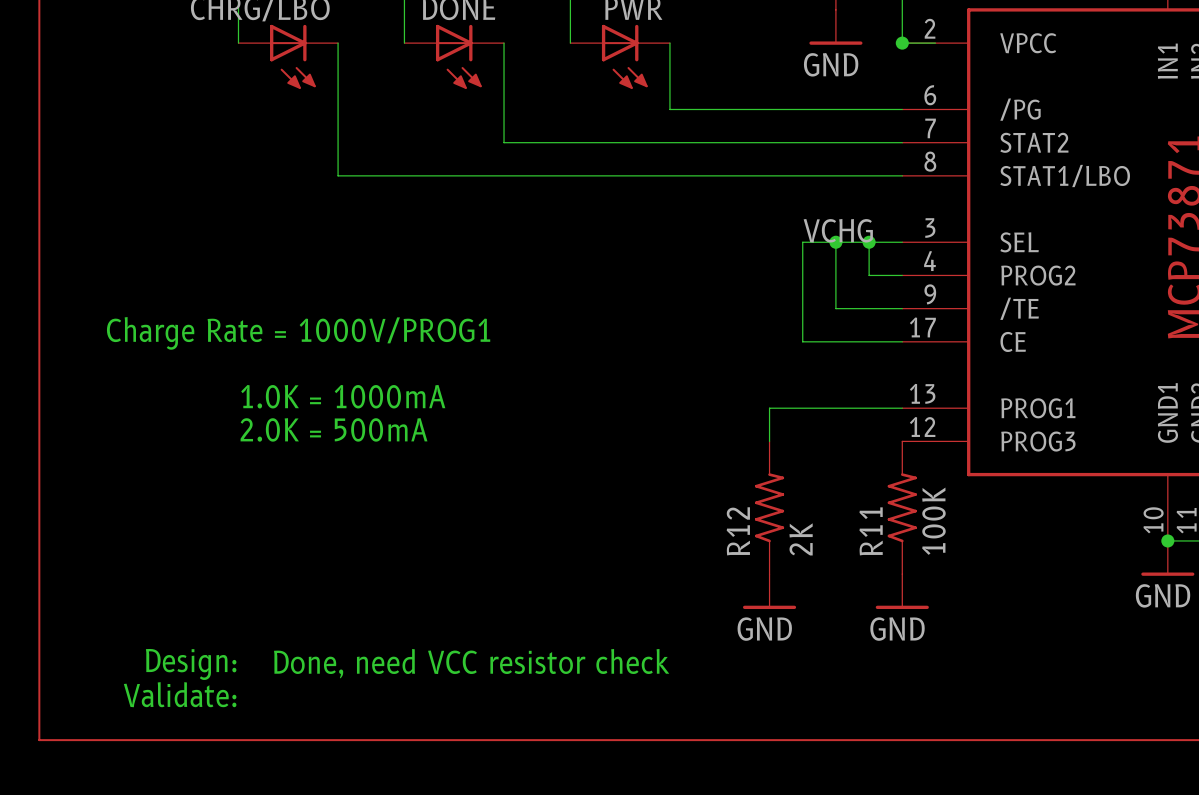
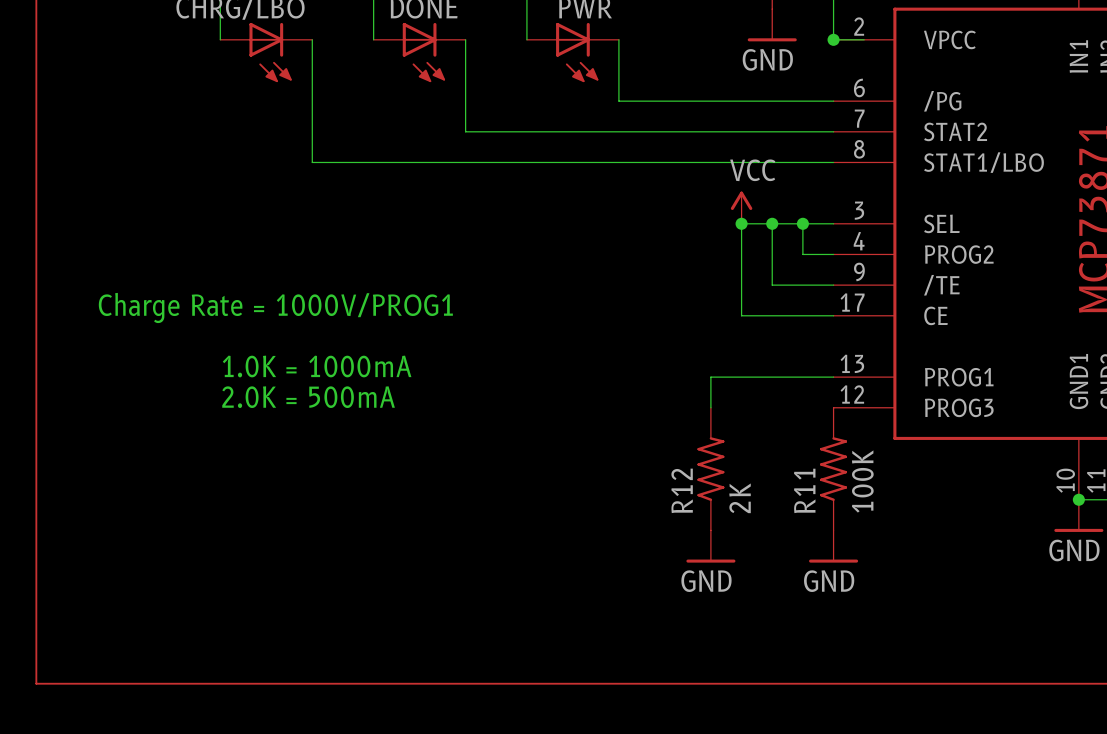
power symbol: none -> VCC (741, 207)
label: VCHG (838, 230) -> none
junction: none -> (741, 223)
text: Done, need VCC resistor check (471, 663) -> none
text: Design: (191, 664) -> none
text: Validate: (180, 694) -> none

